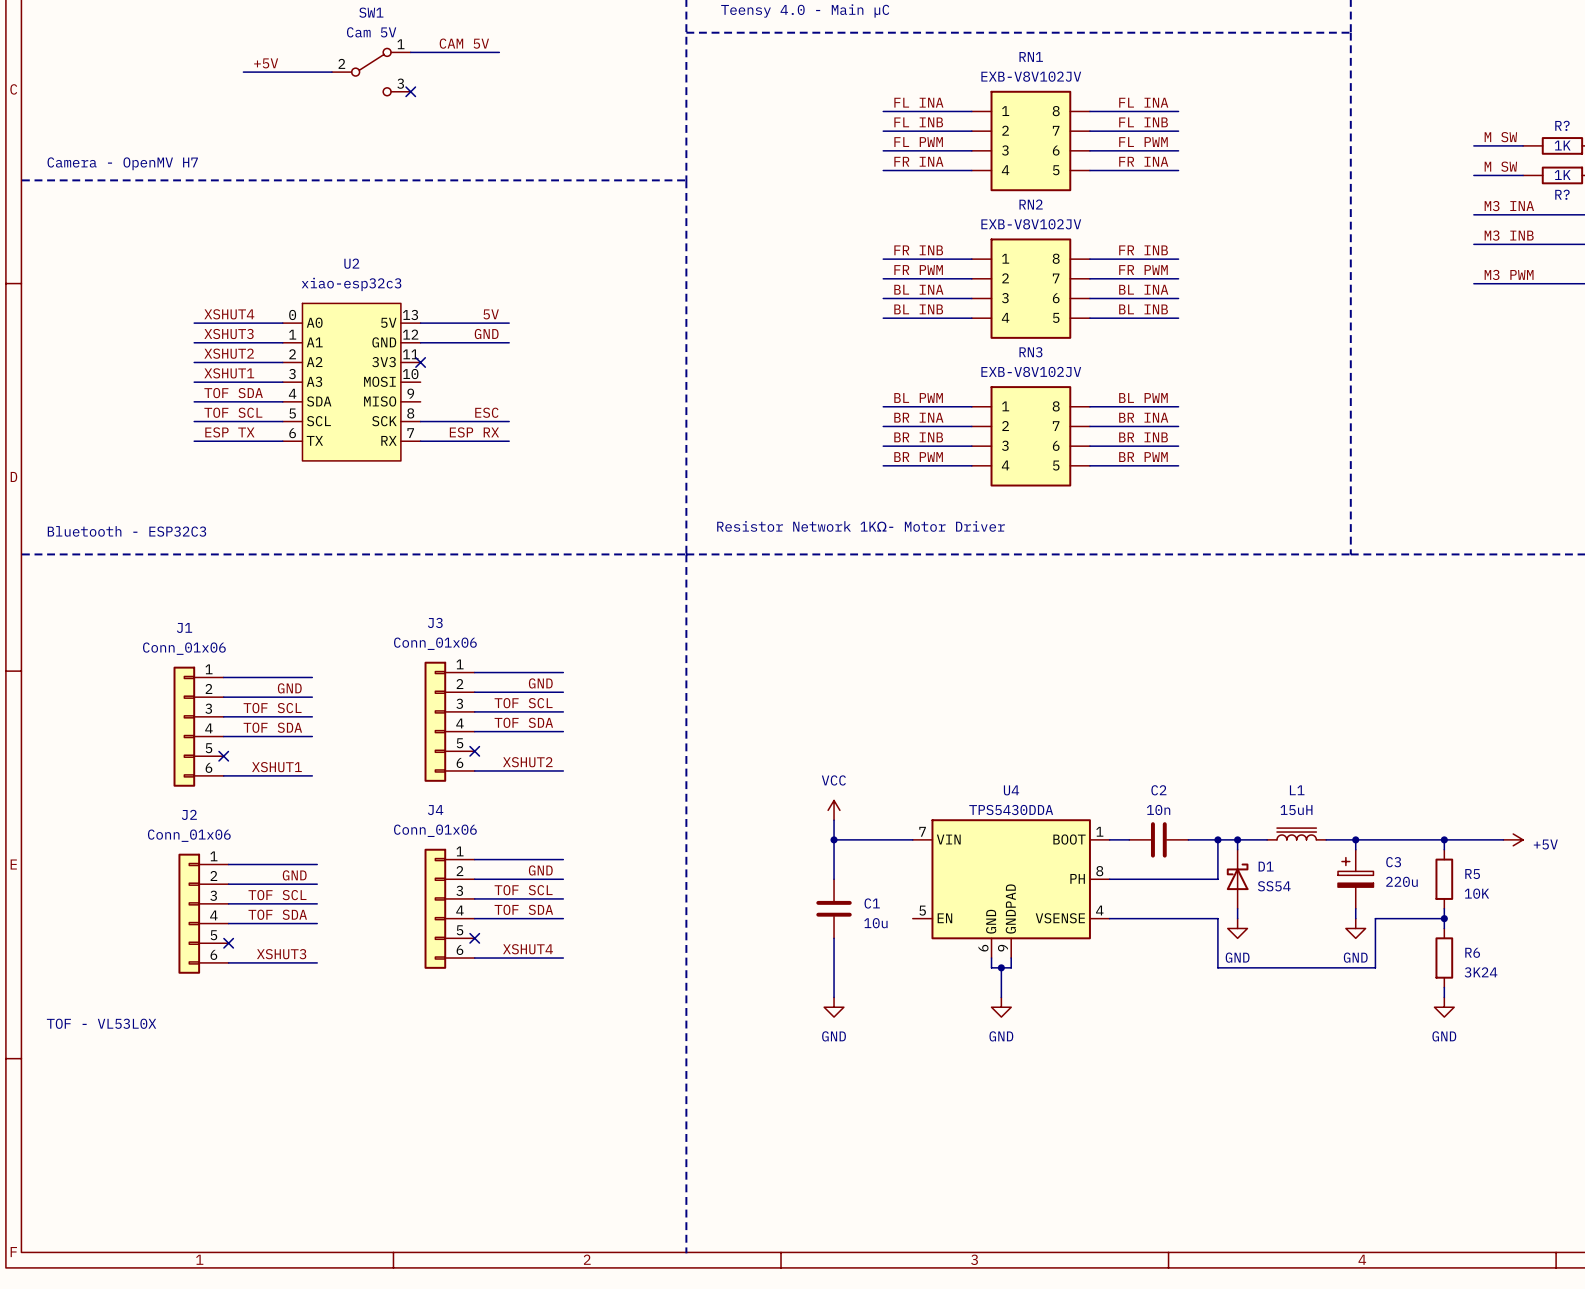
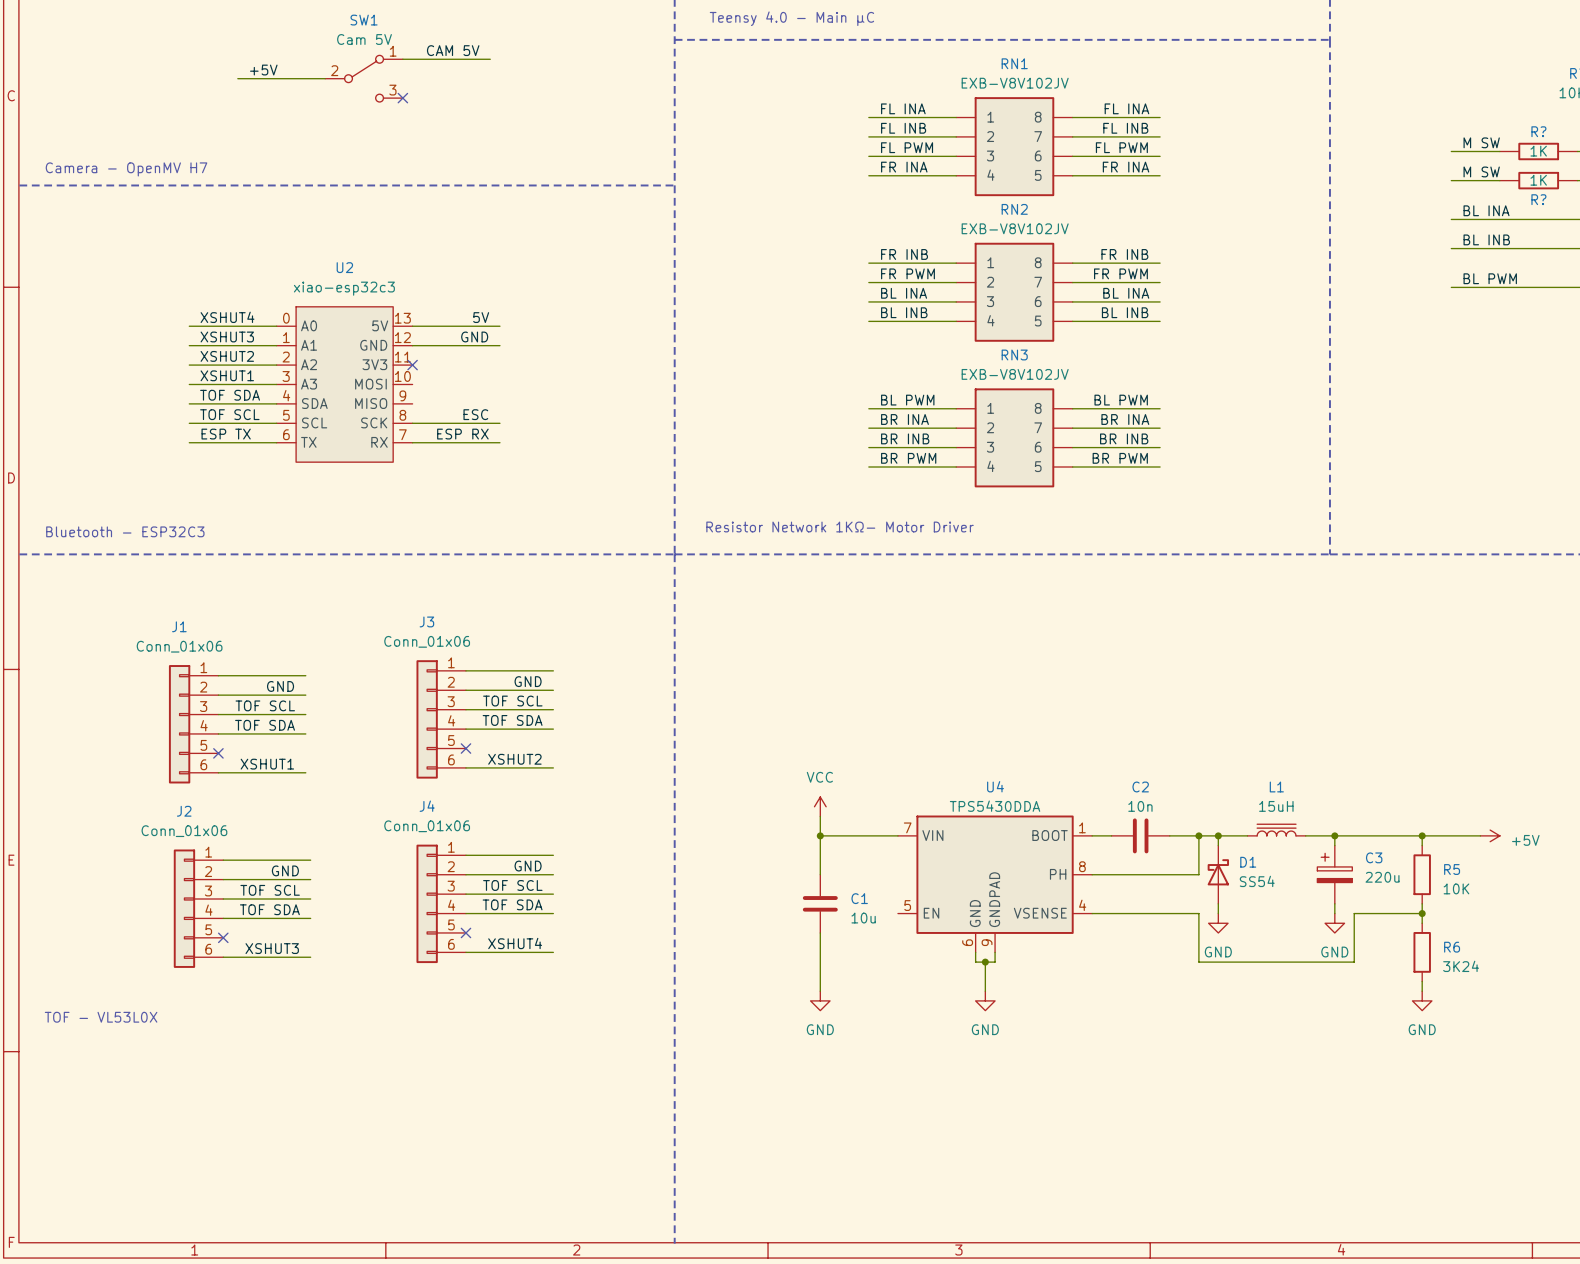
label: M3 INA (1509, 206) -> BL INA (1486, 210)
label: M3 INB (1509, 235) -> BL INB (1486, 239)
label: M3 PWM (1509, 274) -> BL PWM (1490, 278)

